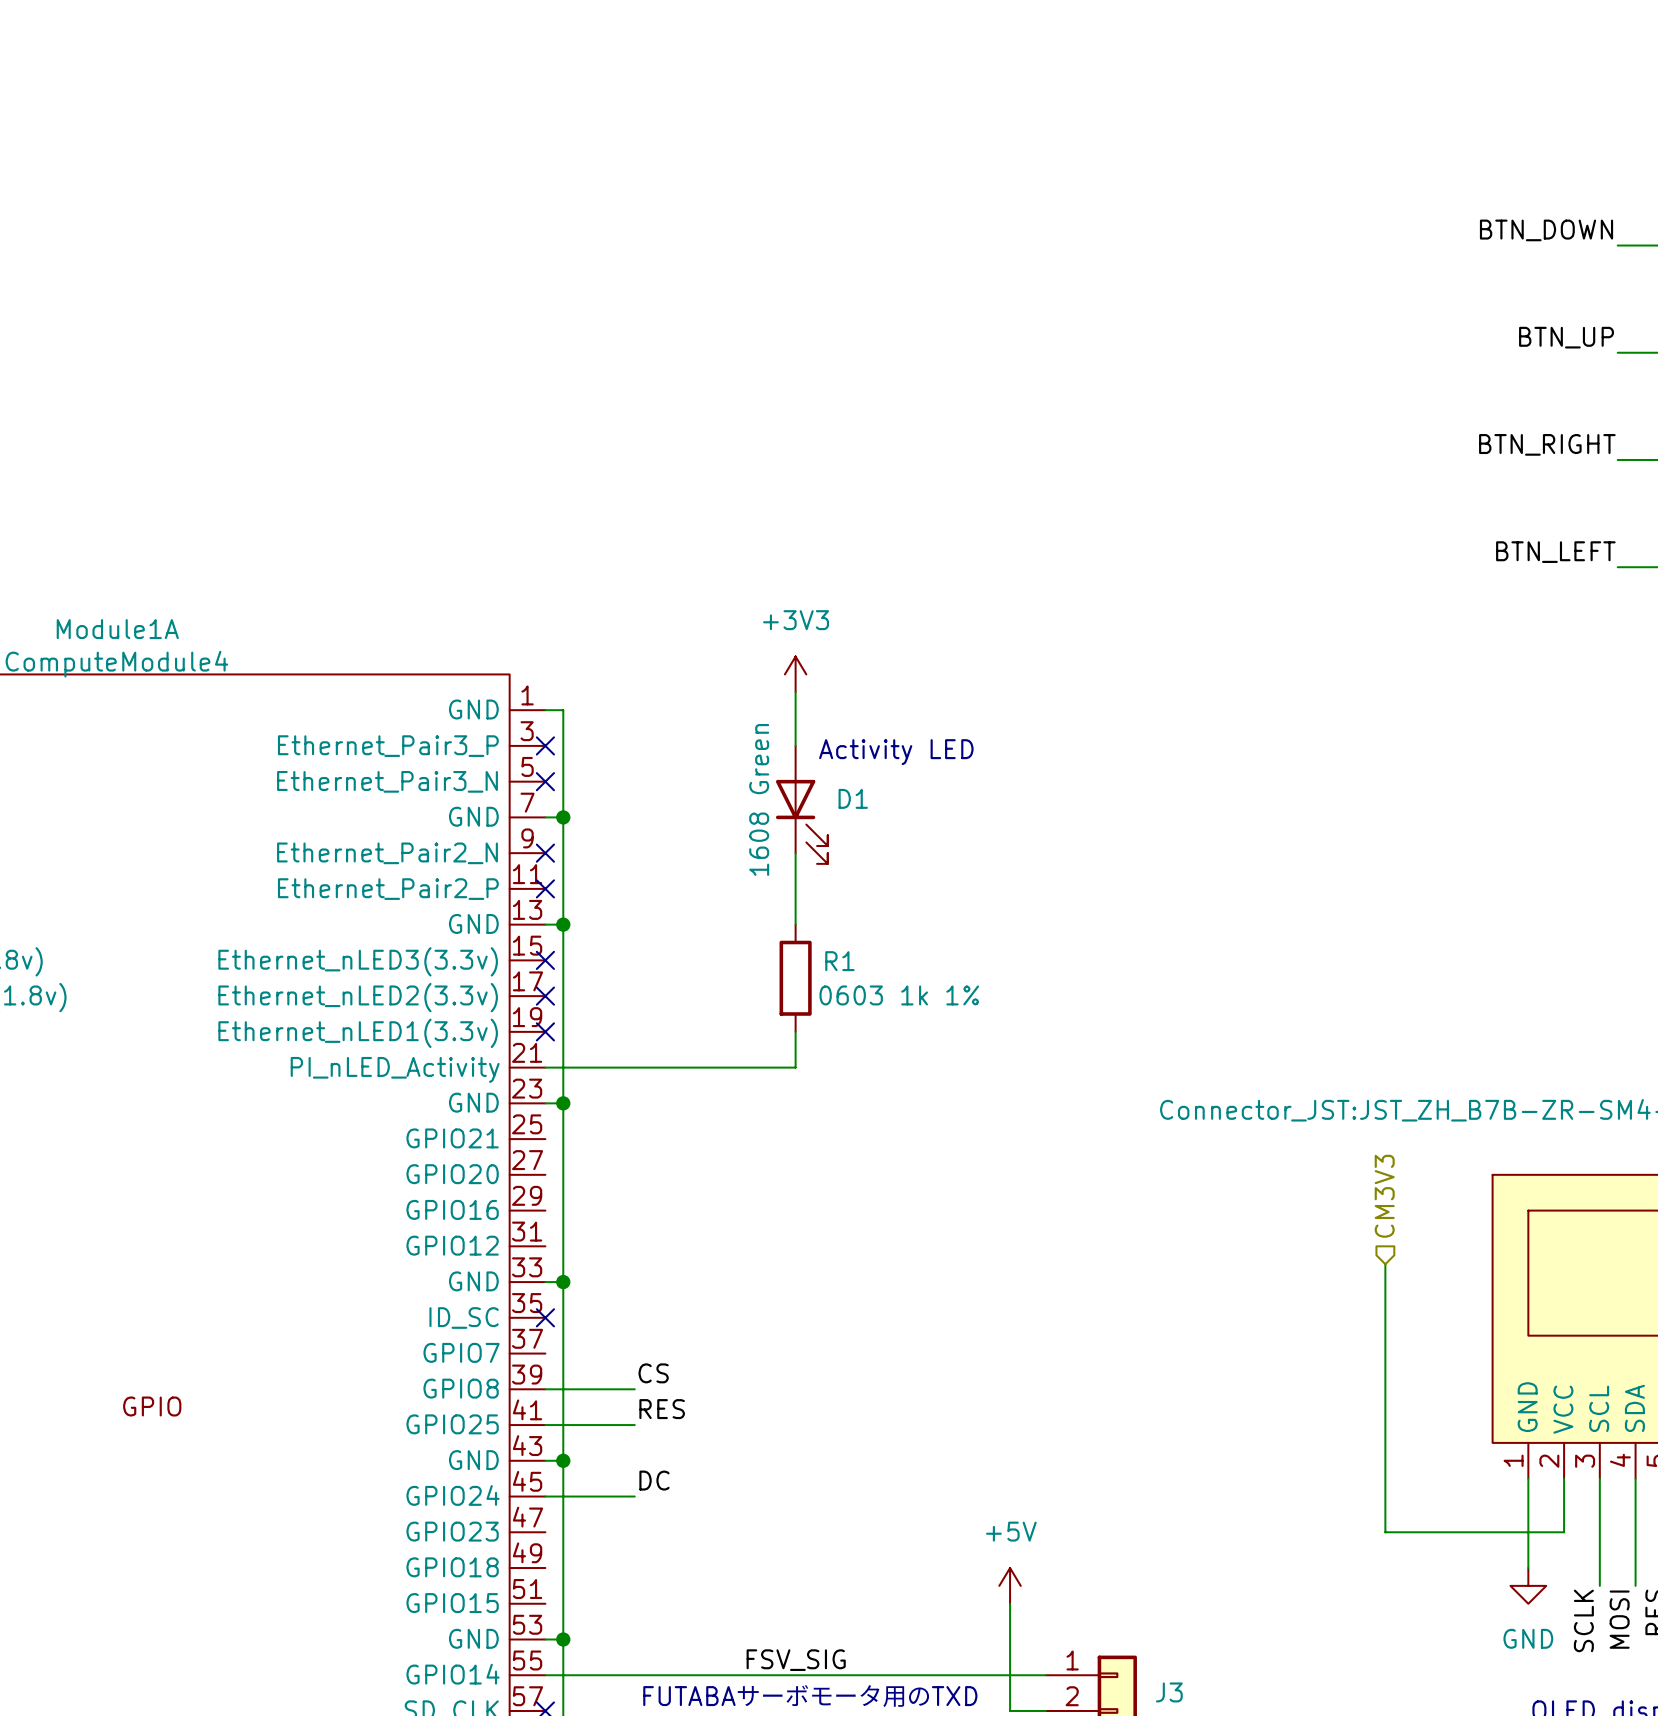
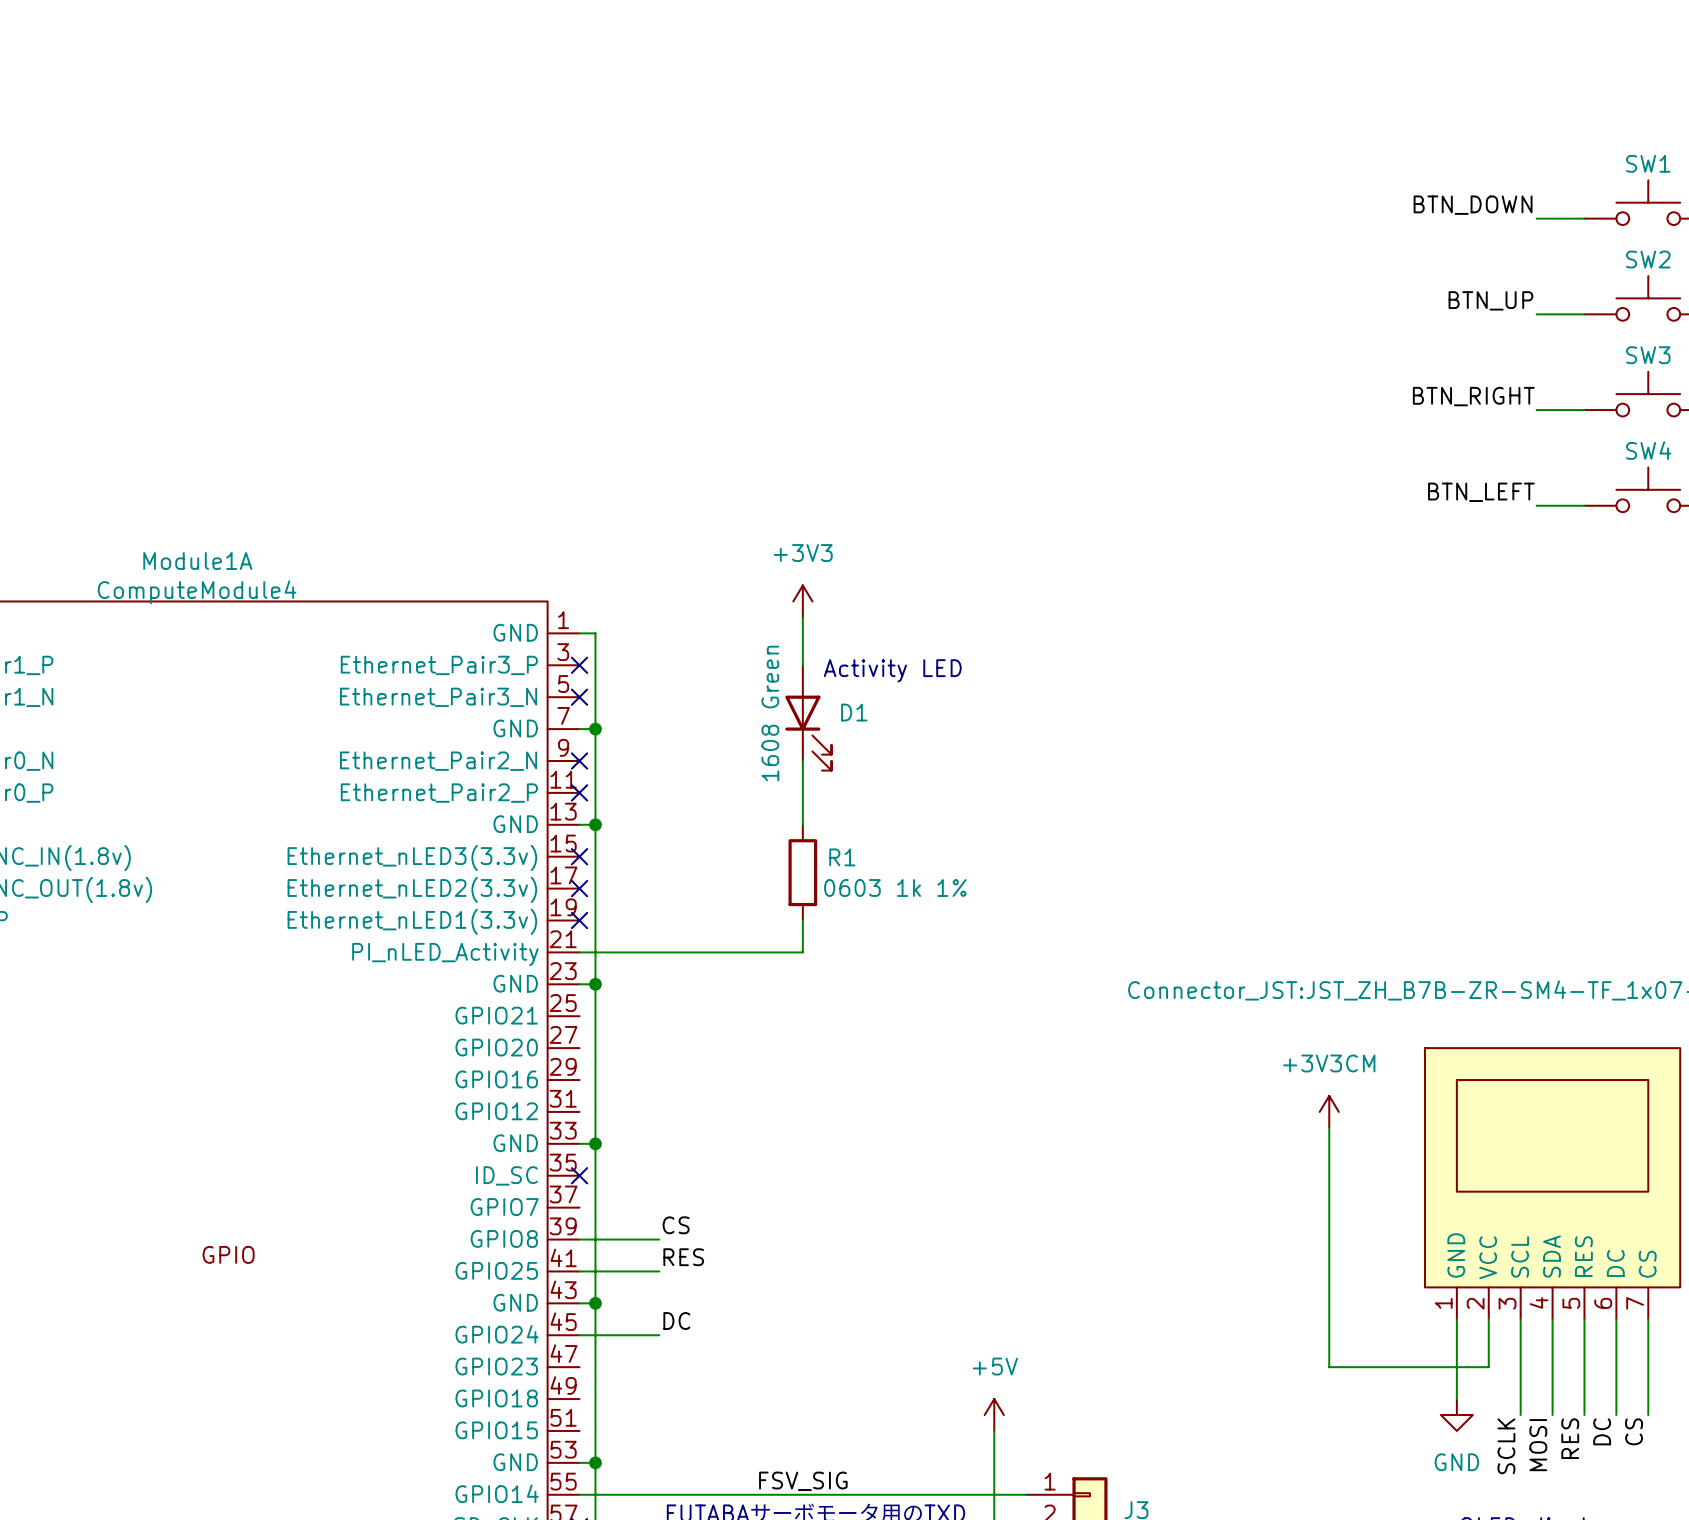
hierarchical label: CM3V3 (1384, 1196) -> none
power symbol: none -> +3V3CM (1329, 1111)

